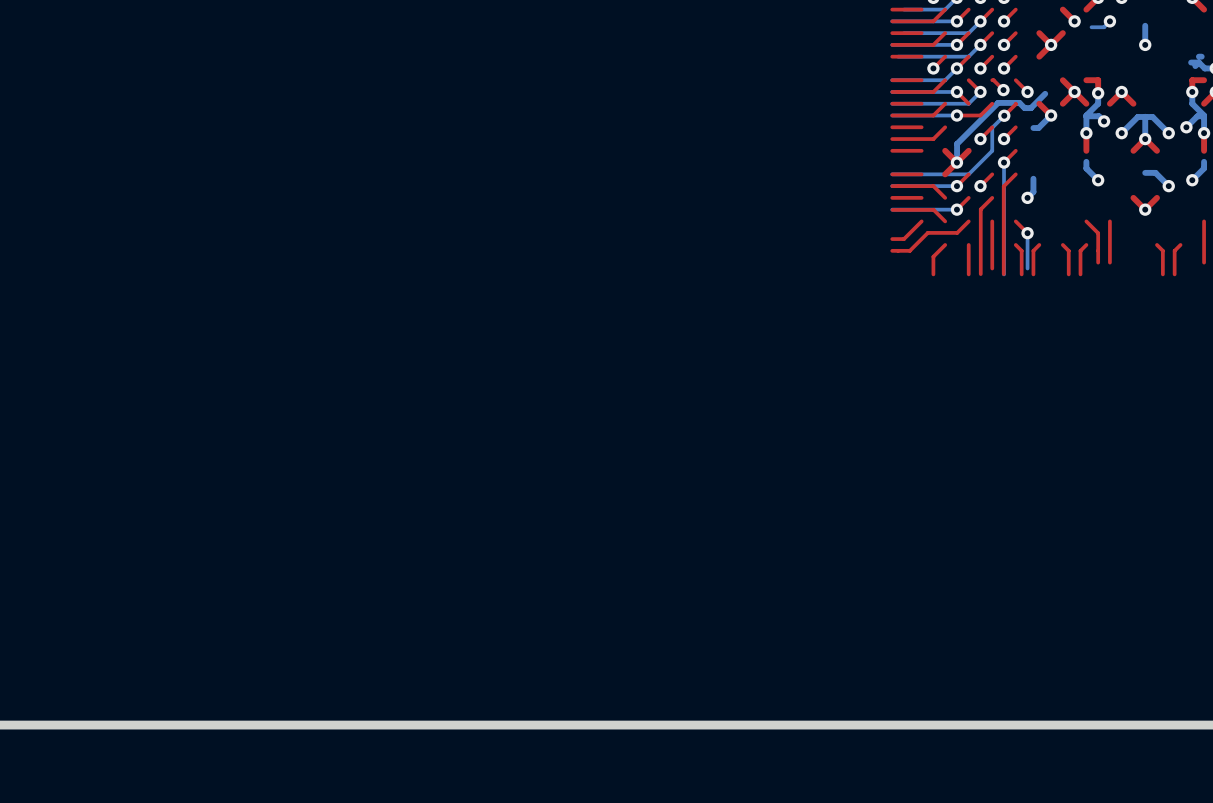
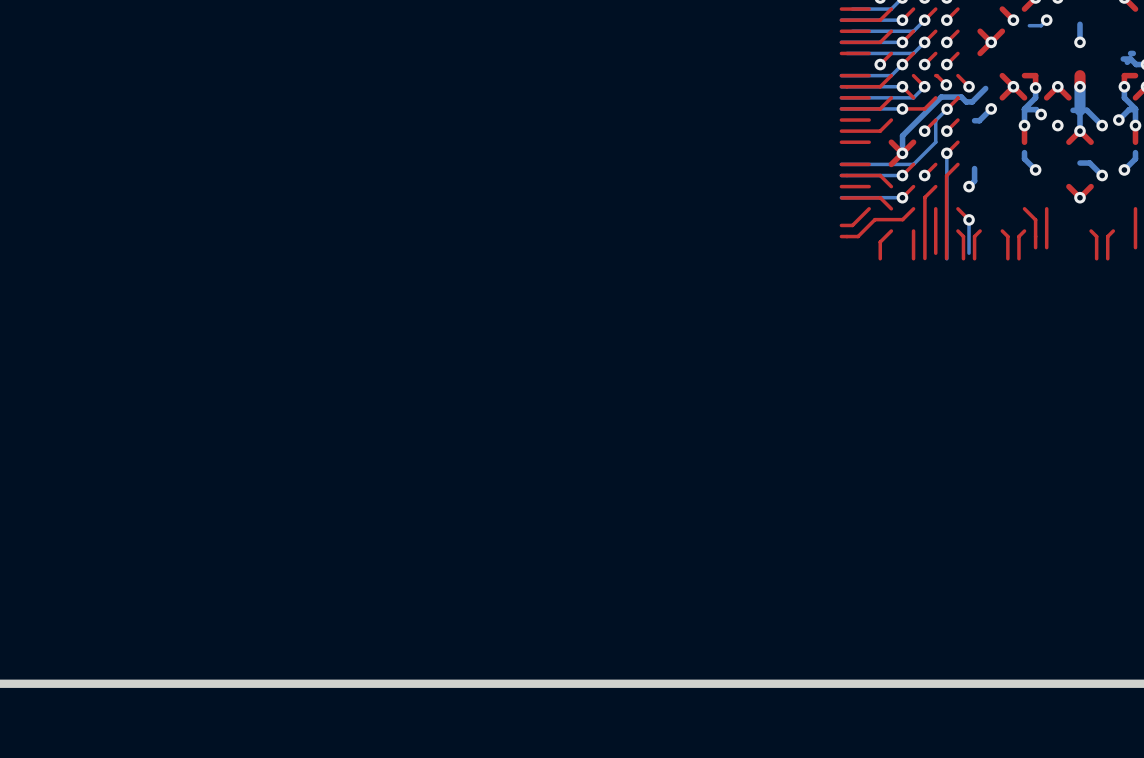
top track: none -> (1080, 75) (1080, 86)
bottom track: none -> (1080, 86) (1080, 110)
via: none -> (1080, 86)
top track: (1039, 103) (1051, 115) -> none
bottom track: (1137, 116) (1121, 133) -> none

